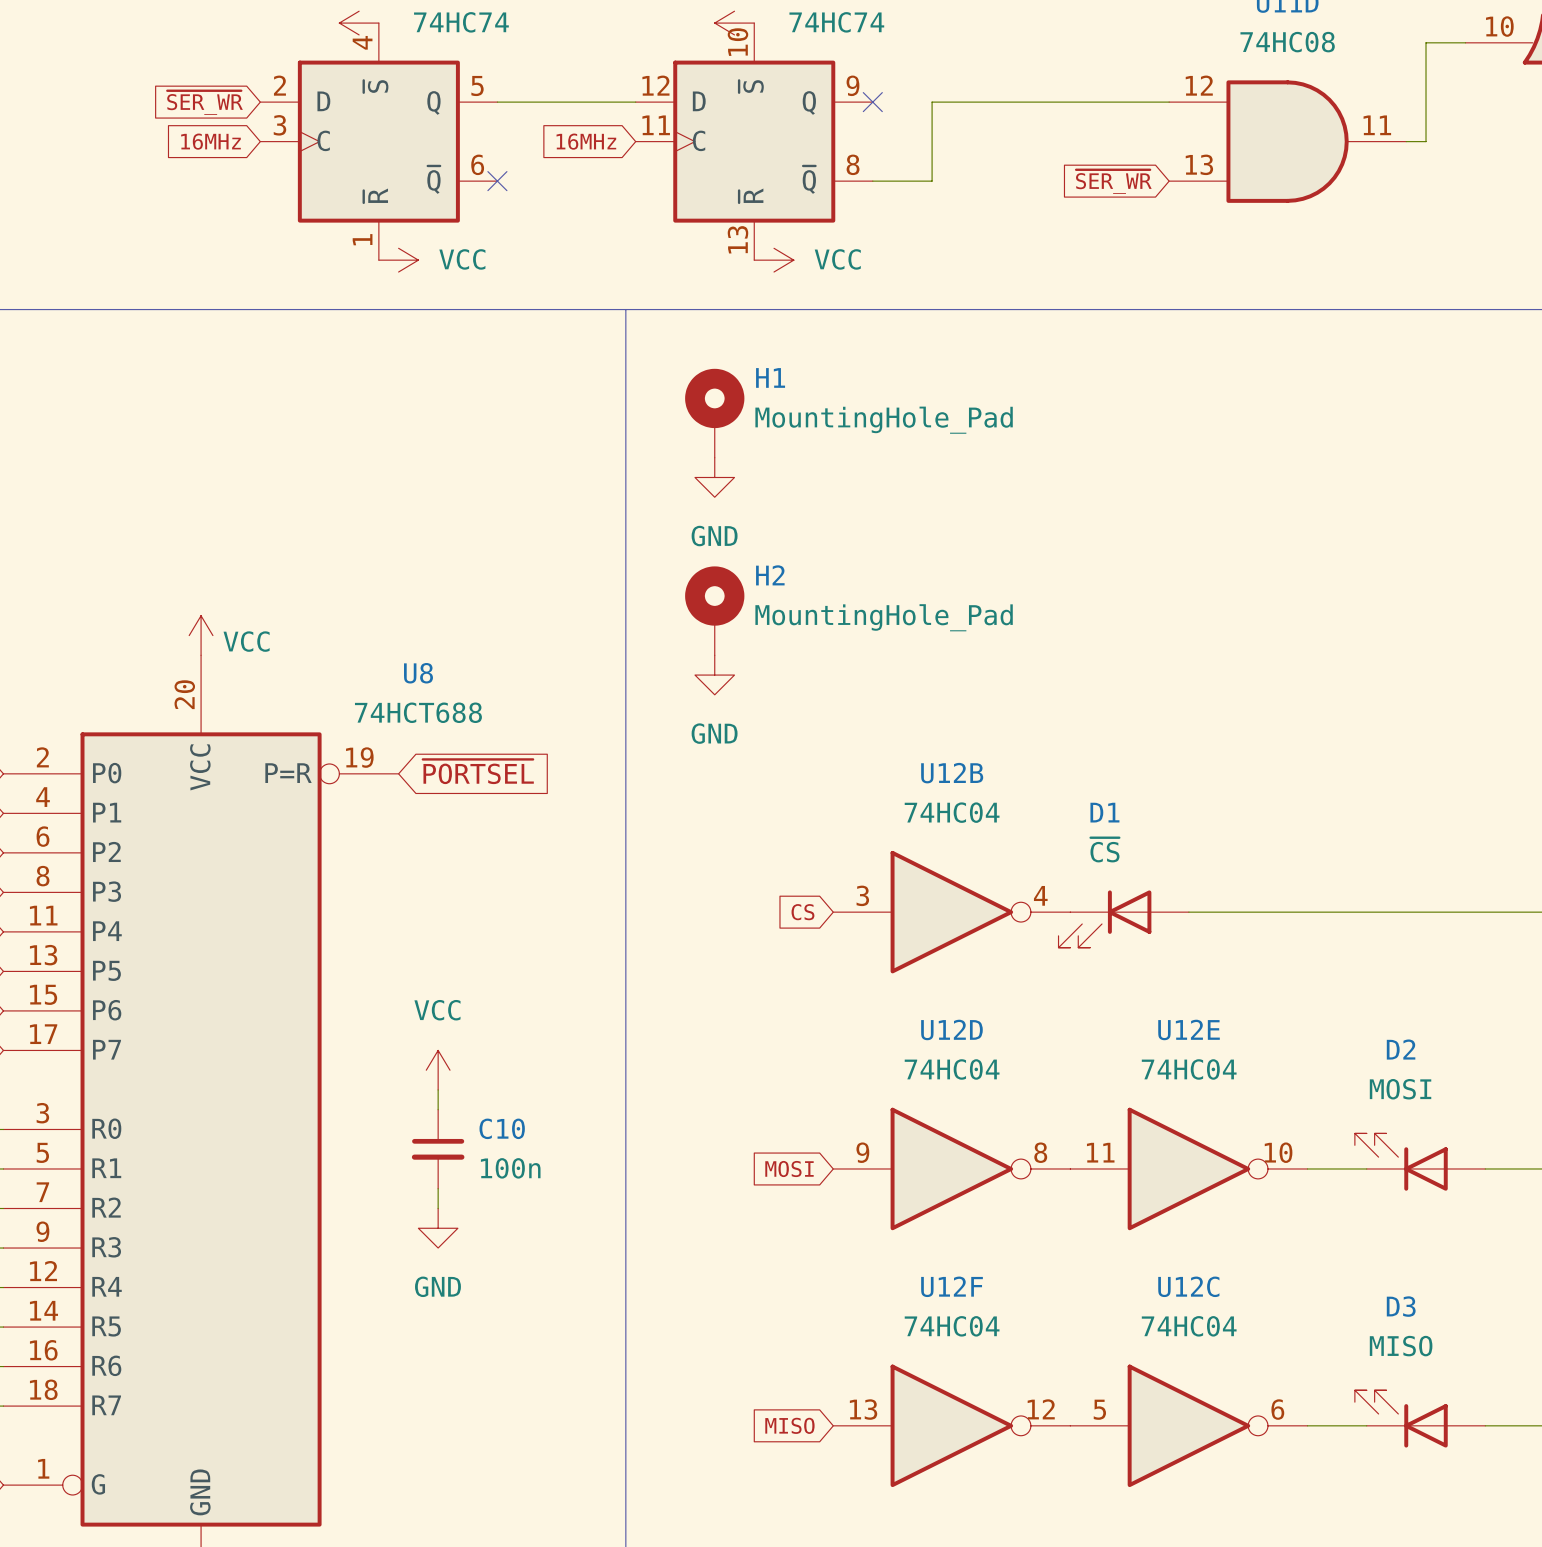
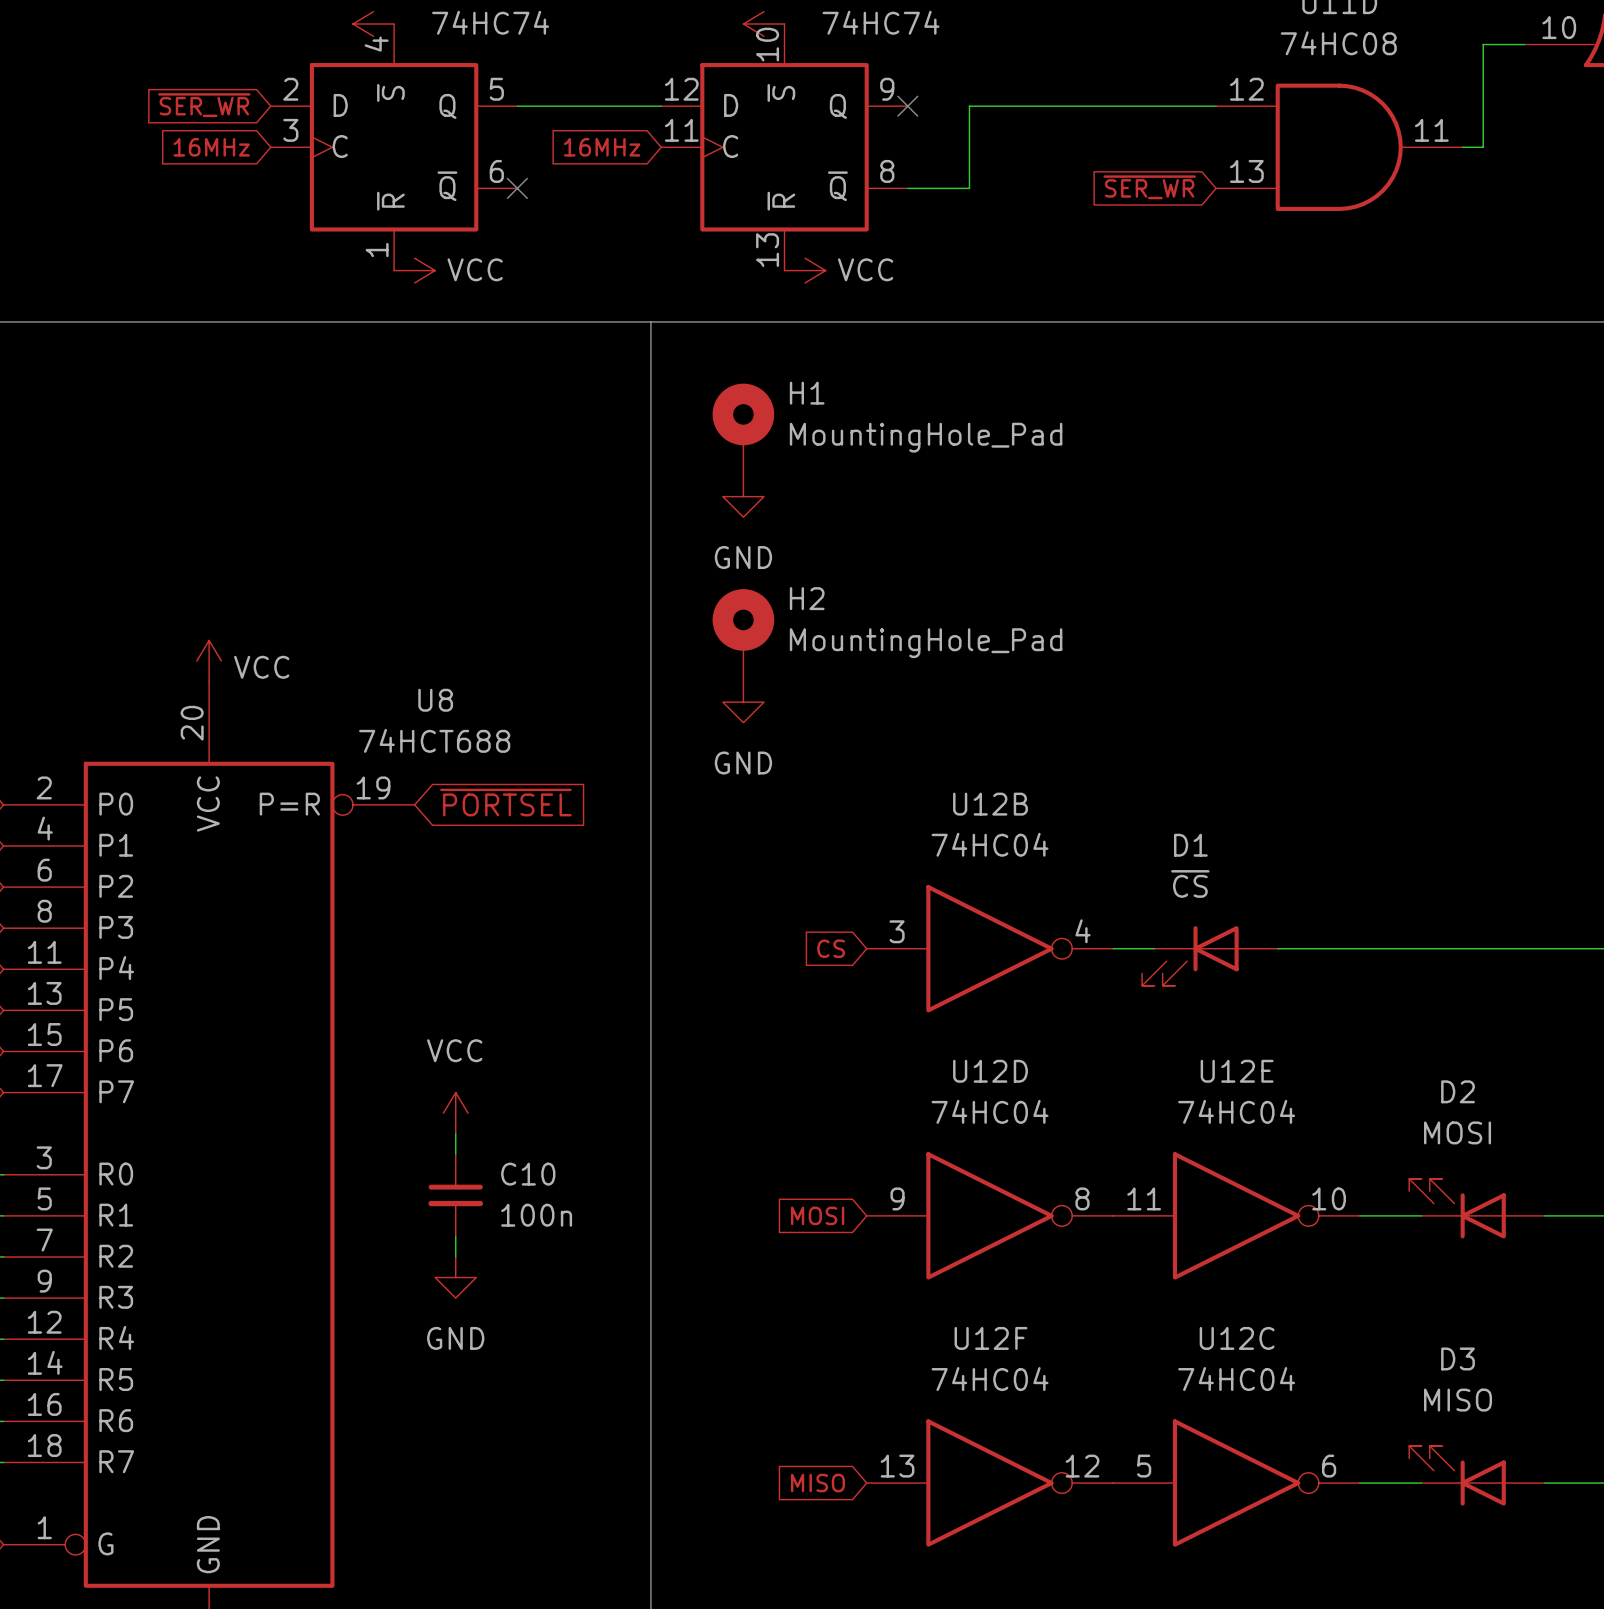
D1 position: (1123, 919) -> (1209, 955)

